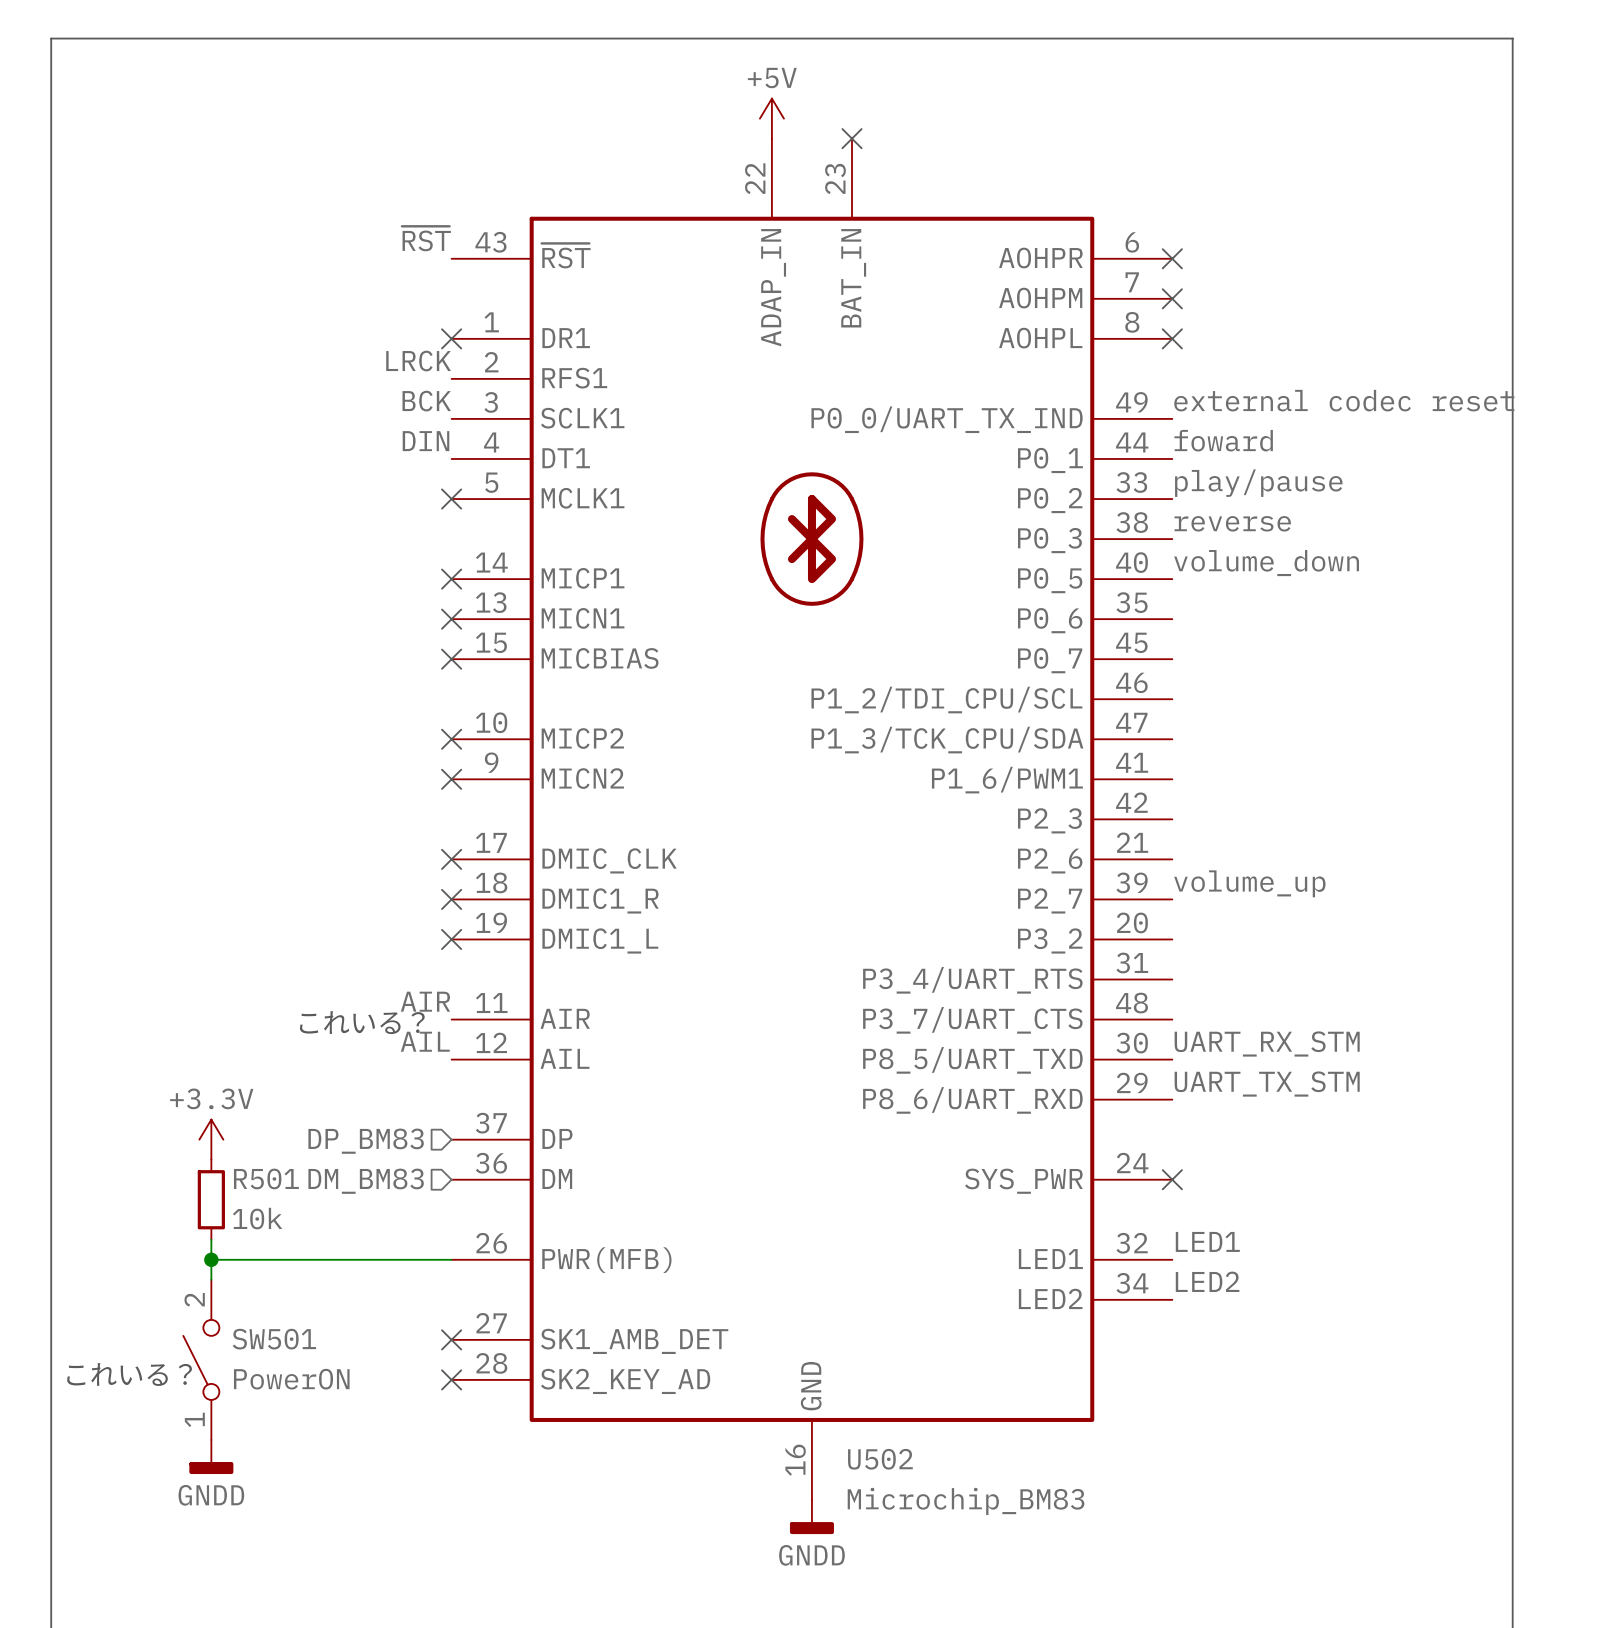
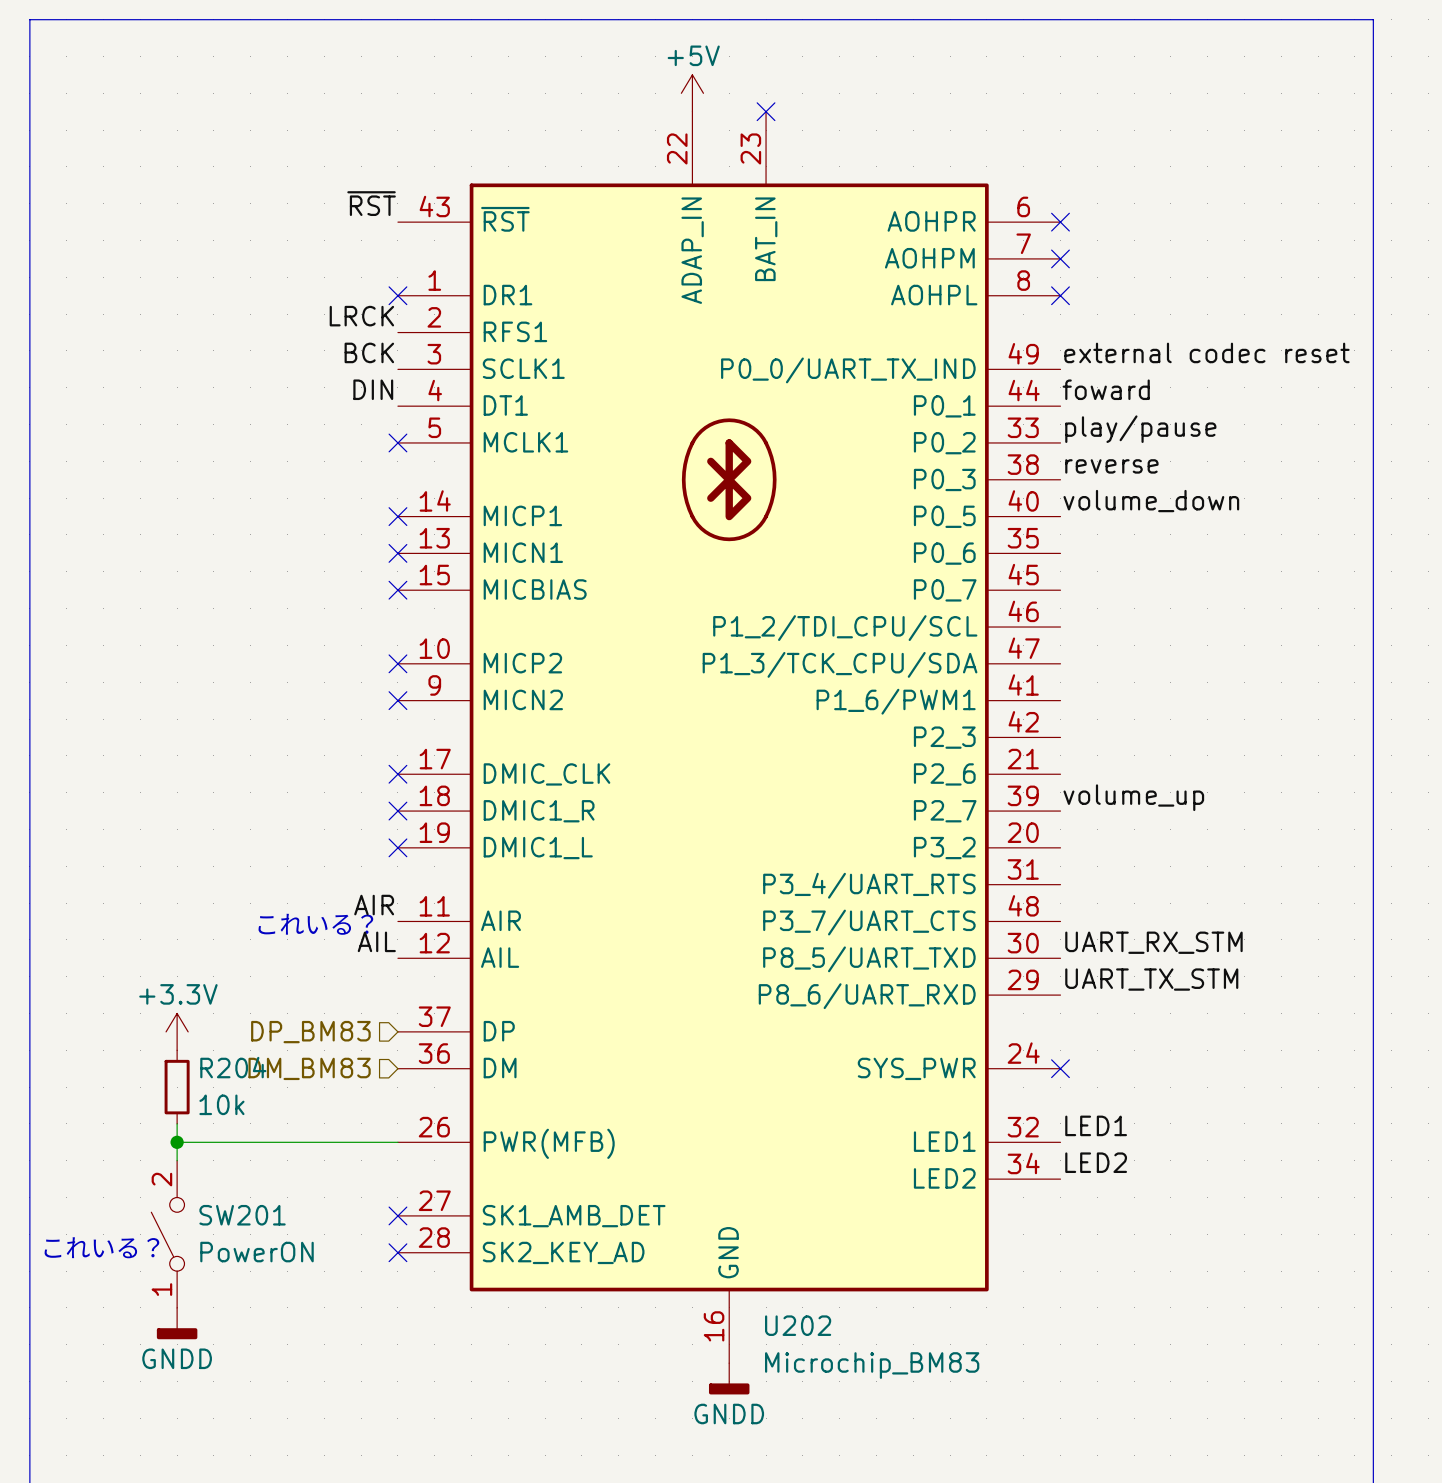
R501 name: R501 (266, 1178) -> R204 (233, 1067)
SW501 name: SW501 (274, 1339) -> SW201 (242, 1215)
U502 name: U502 (880, 1459) -> U202 (798, 1325)

